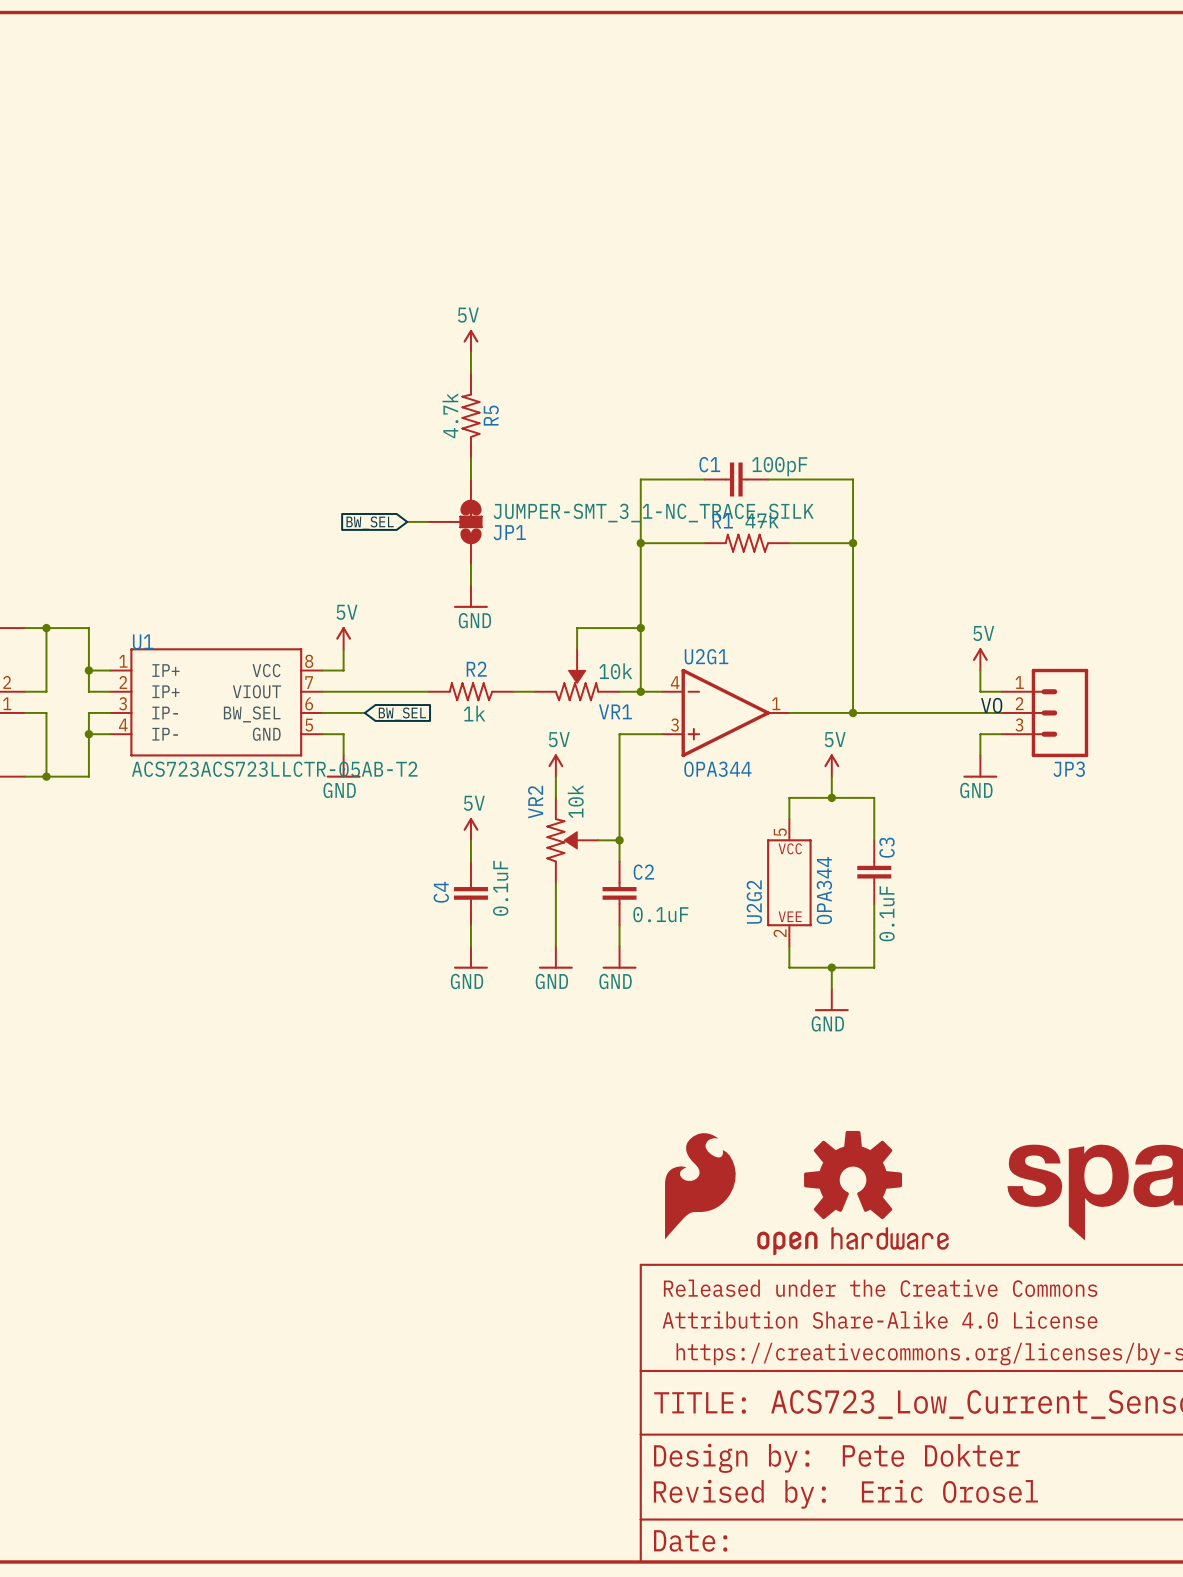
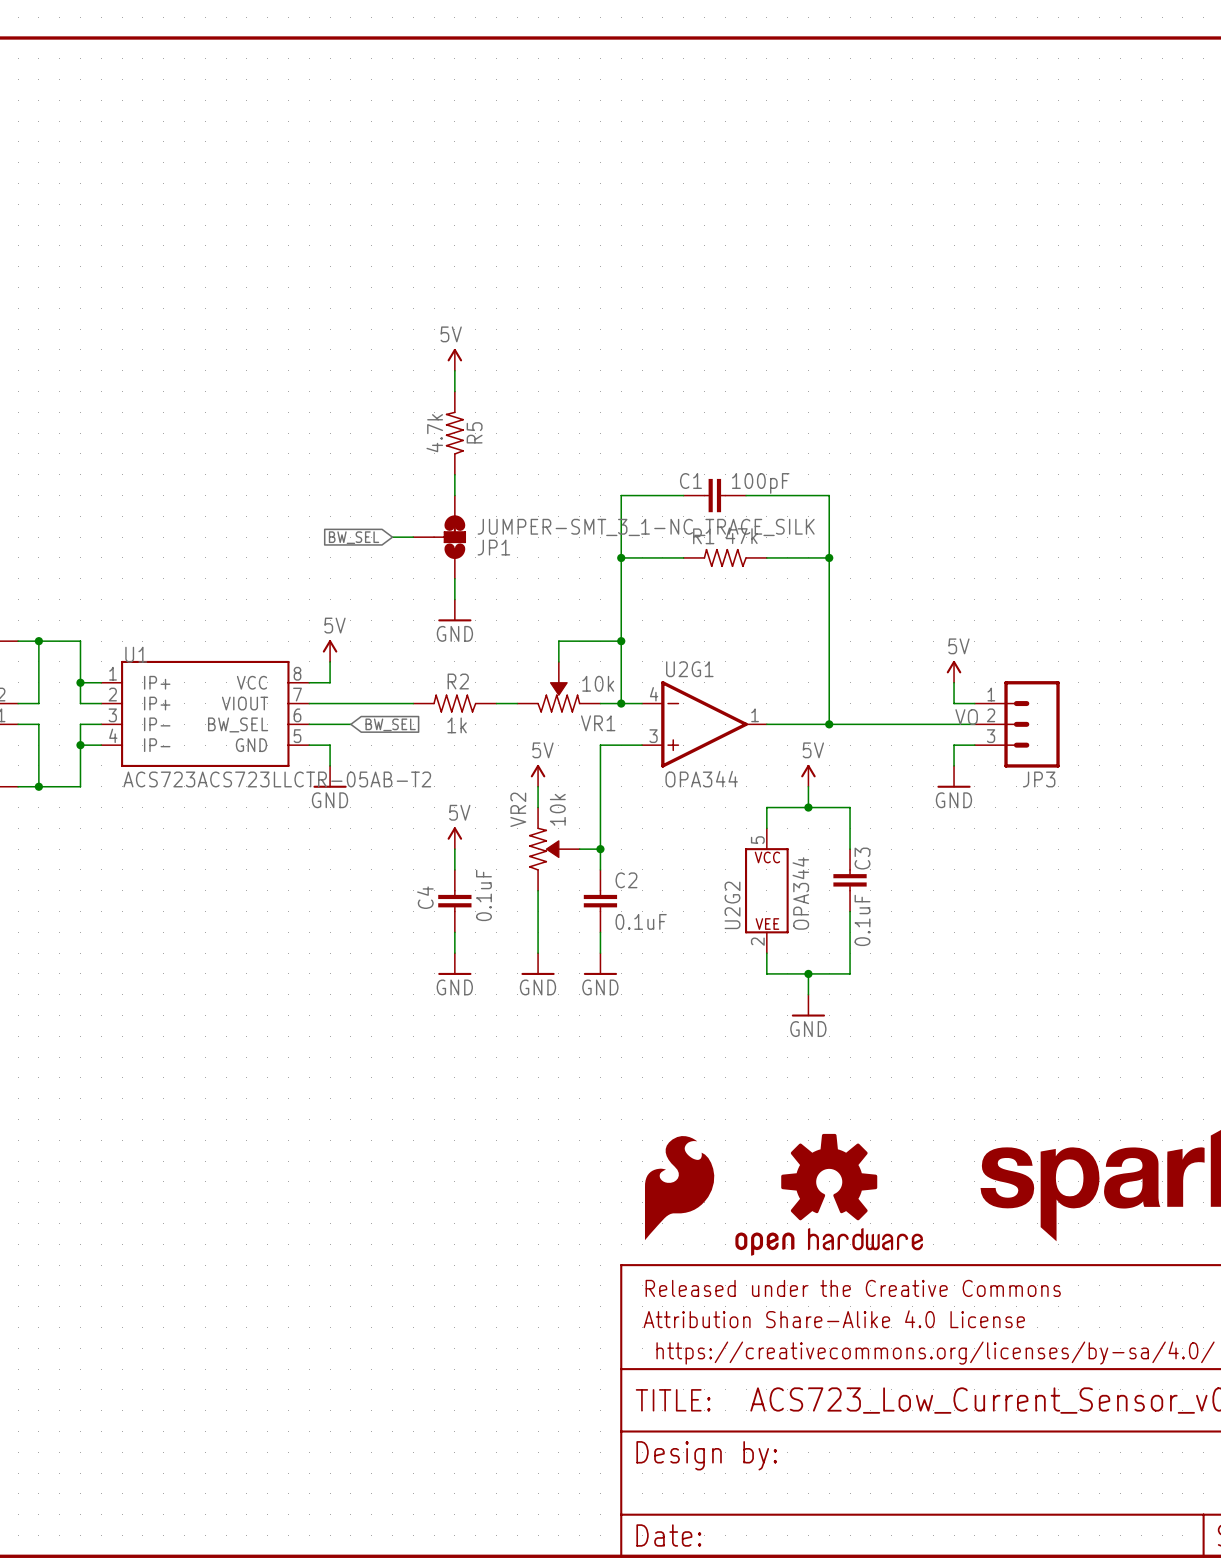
text: Pete Dokter (931, 1455) -> none
text: Eric Orosel (949, 1491) -> none
text: Revised by: (739, 1494) -> none

